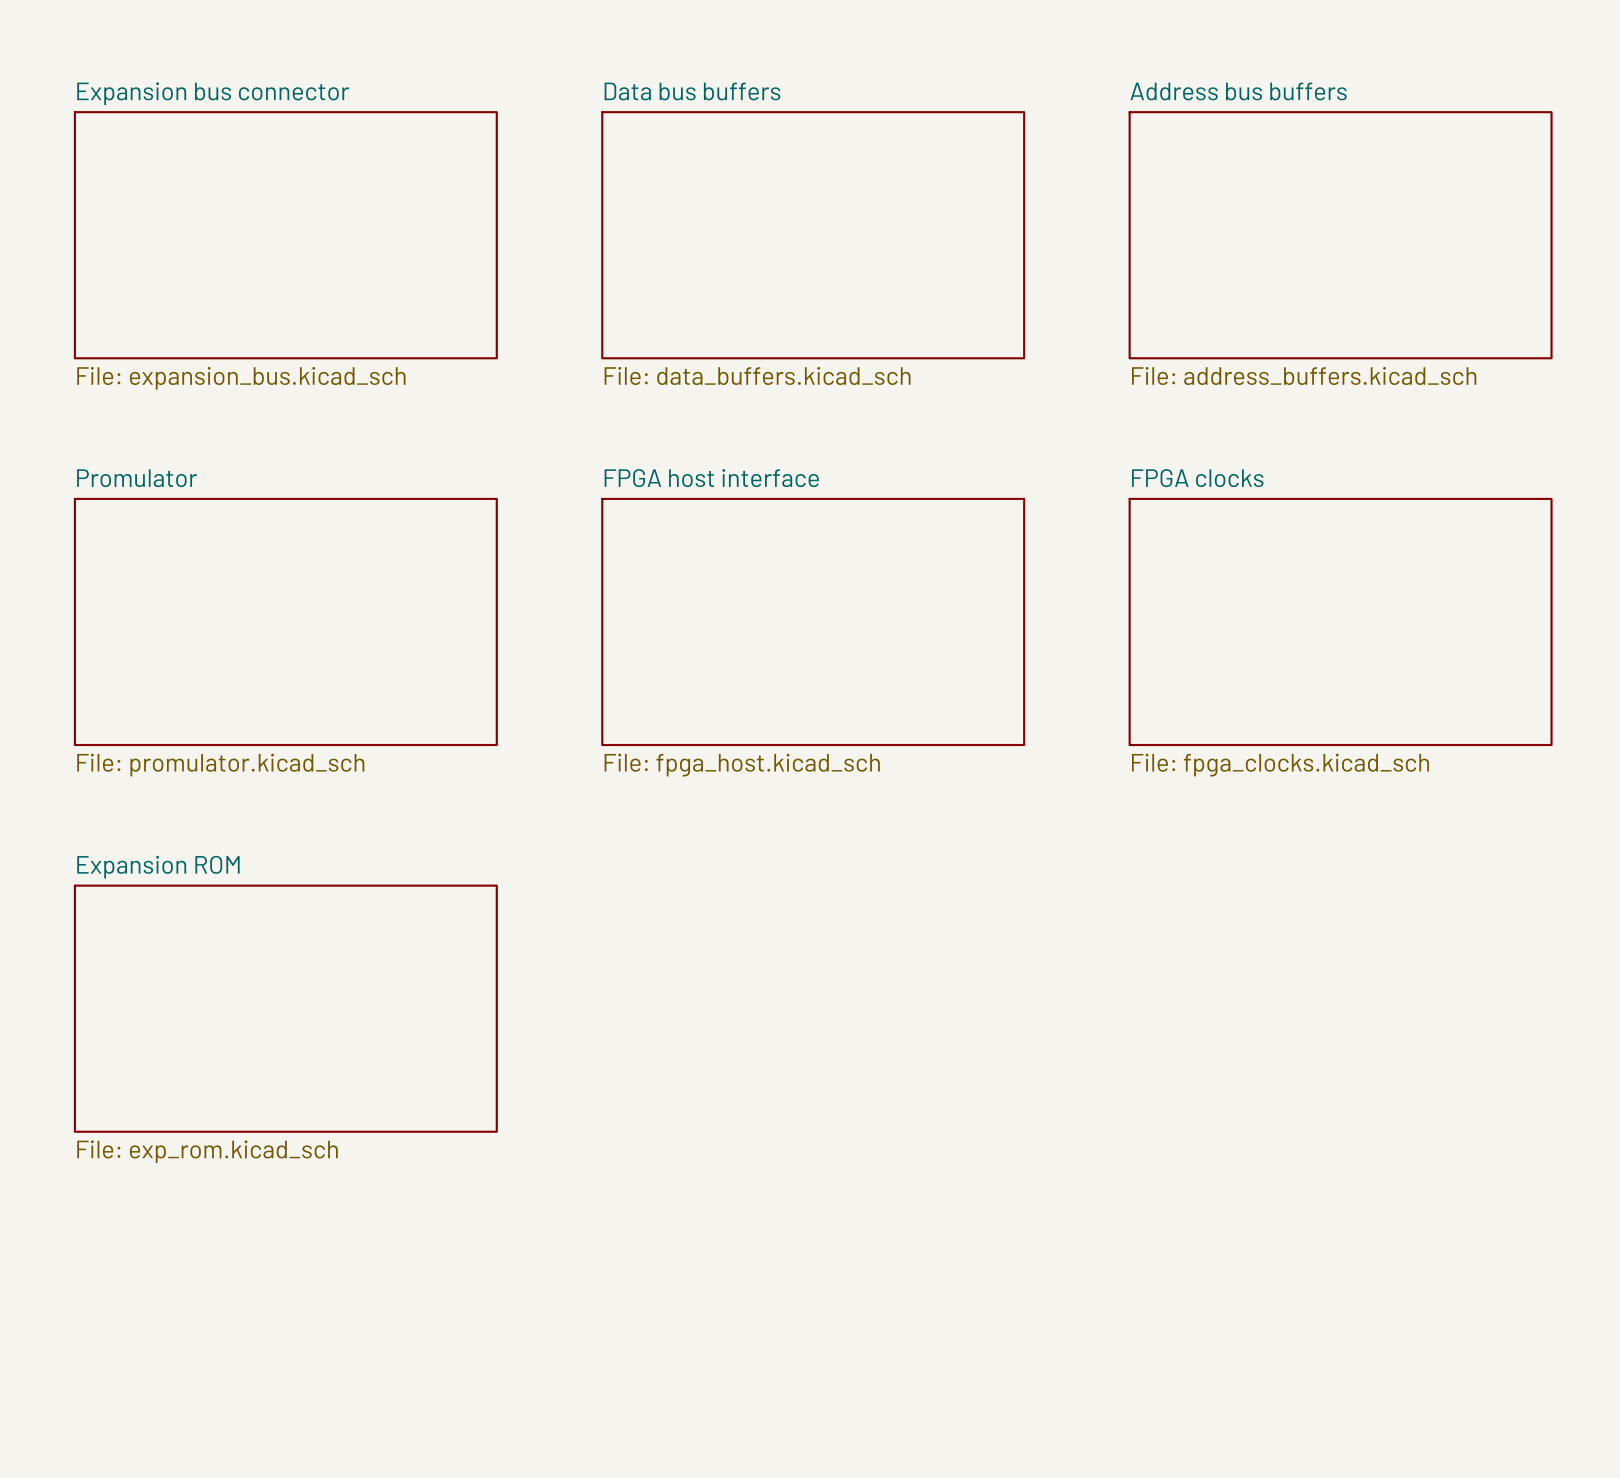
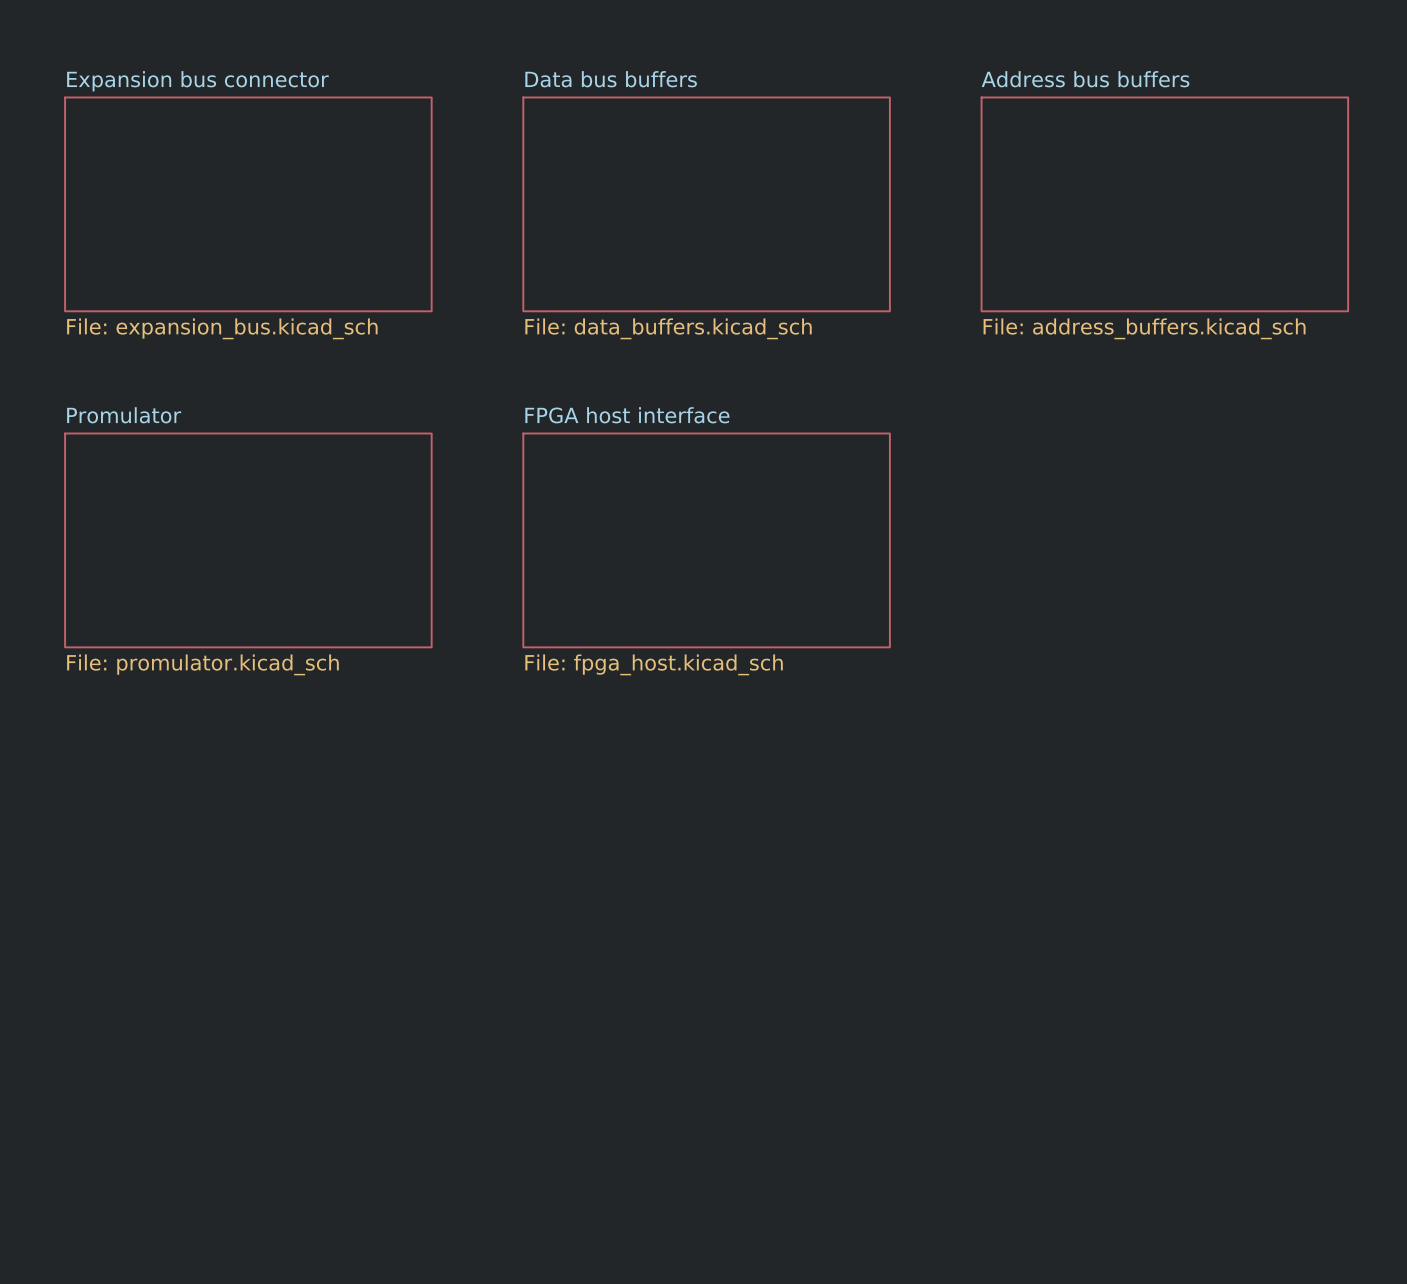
sheet FPGA clocks: File: fpga_clocks.kicad_sch (1340, 621) -> none
sheet Expansion ROM: File: exp_rom.kicad_sch (285, 1008) -> none

